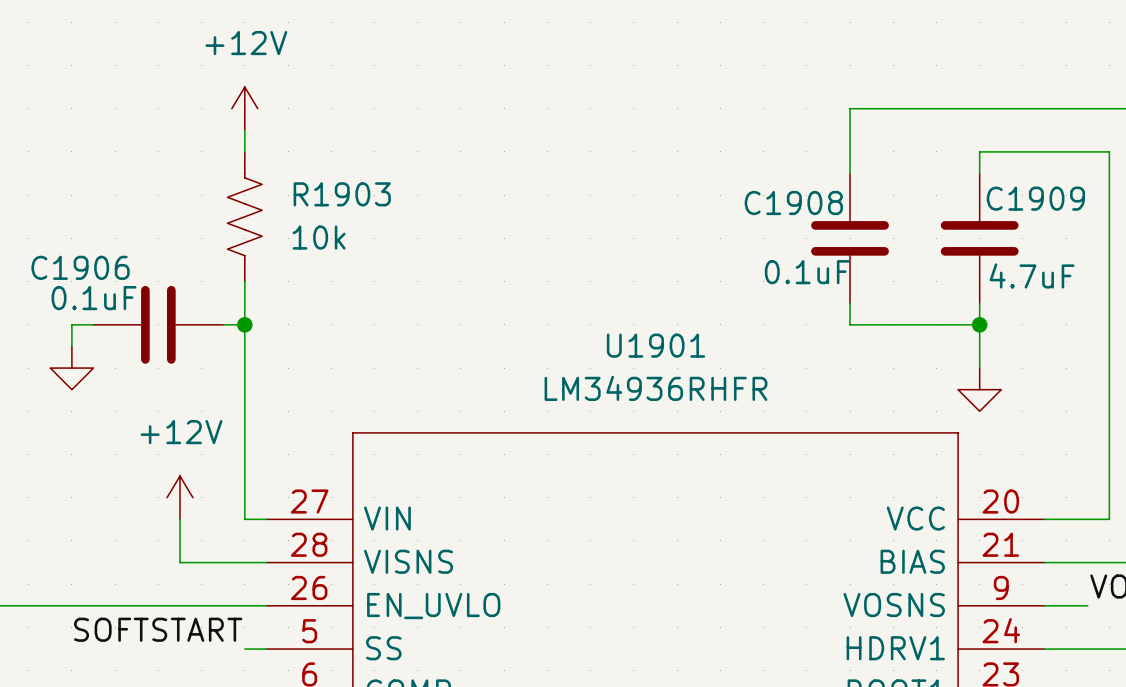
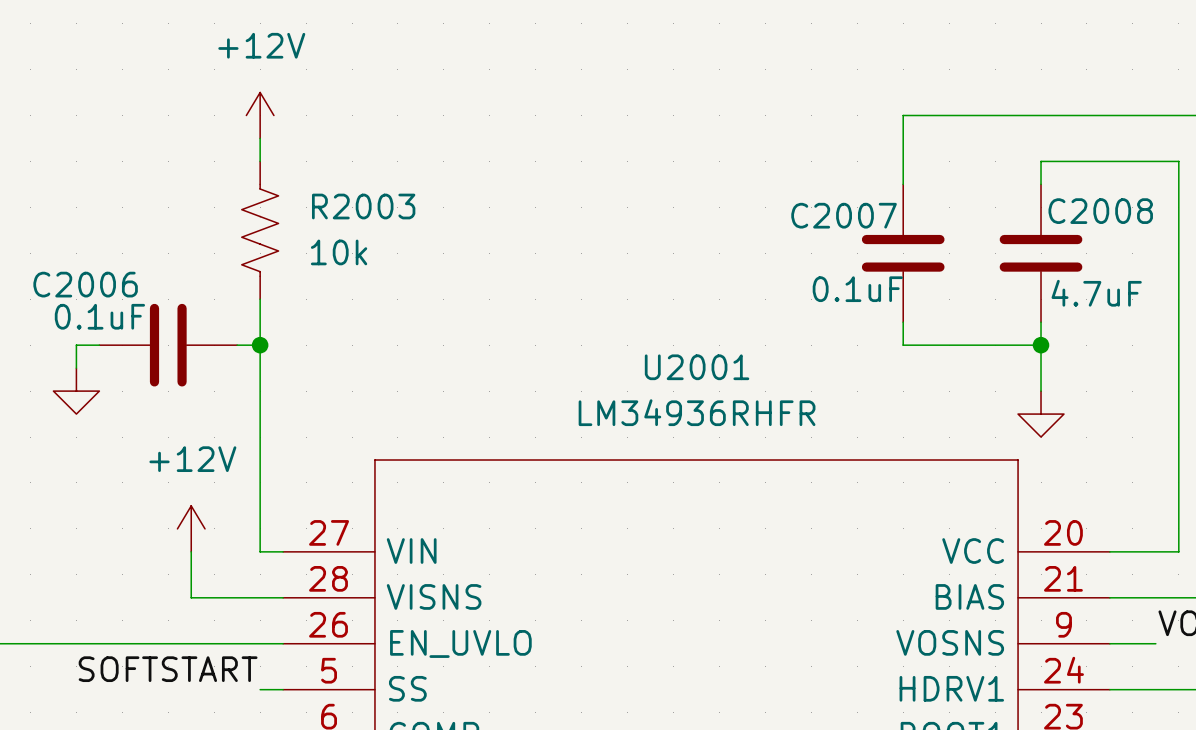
R1903 name: R1903 (342, 194) -> R2003 (363, 206)
C1909 name: C1909 (1035, 198) -> C2008 (1100, 211)
C1908 name: C1908 (793, 202) -> C2007 (844, 215)
C1906 name: C1906 (80, 267) -> C2006 (85, 284)
U1901 name: U1901 (655, 345) -> U2001 (697, 367)

